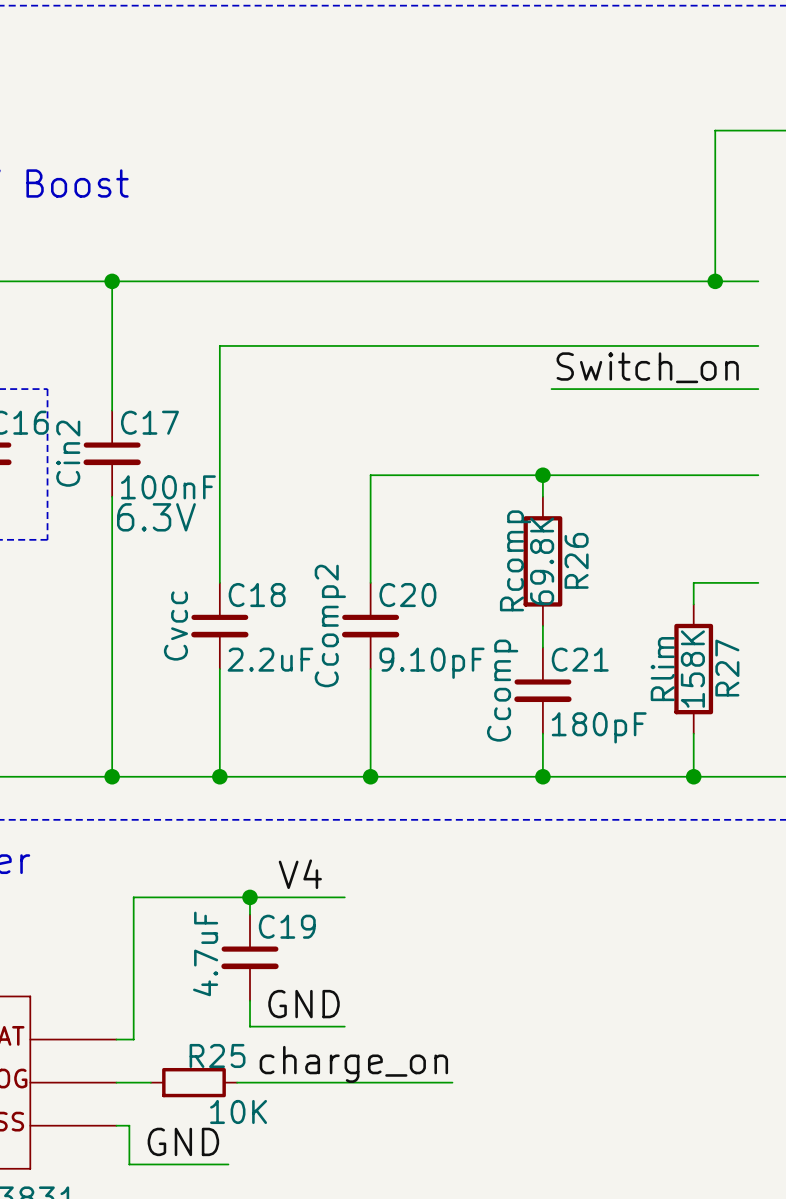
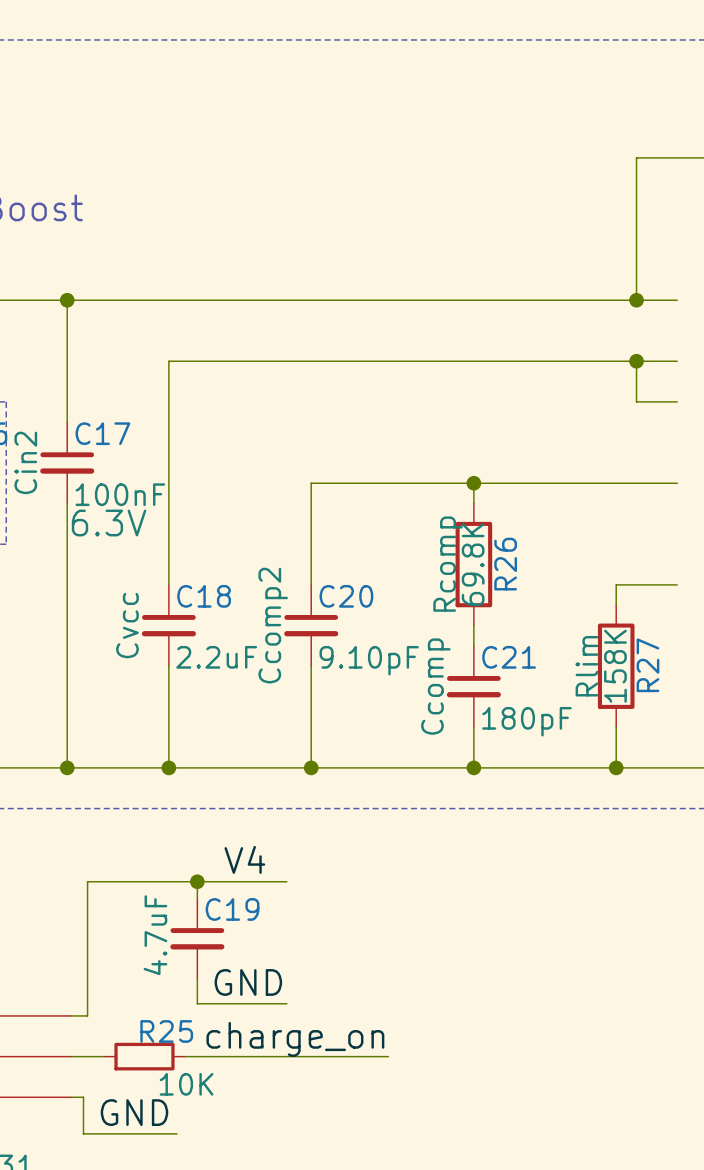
junction: none -> (636, 361)
label: Switch_on (647, 367) -> none
wire: (551, 389) (715, 389) -> (636, 361) (636, 401)

